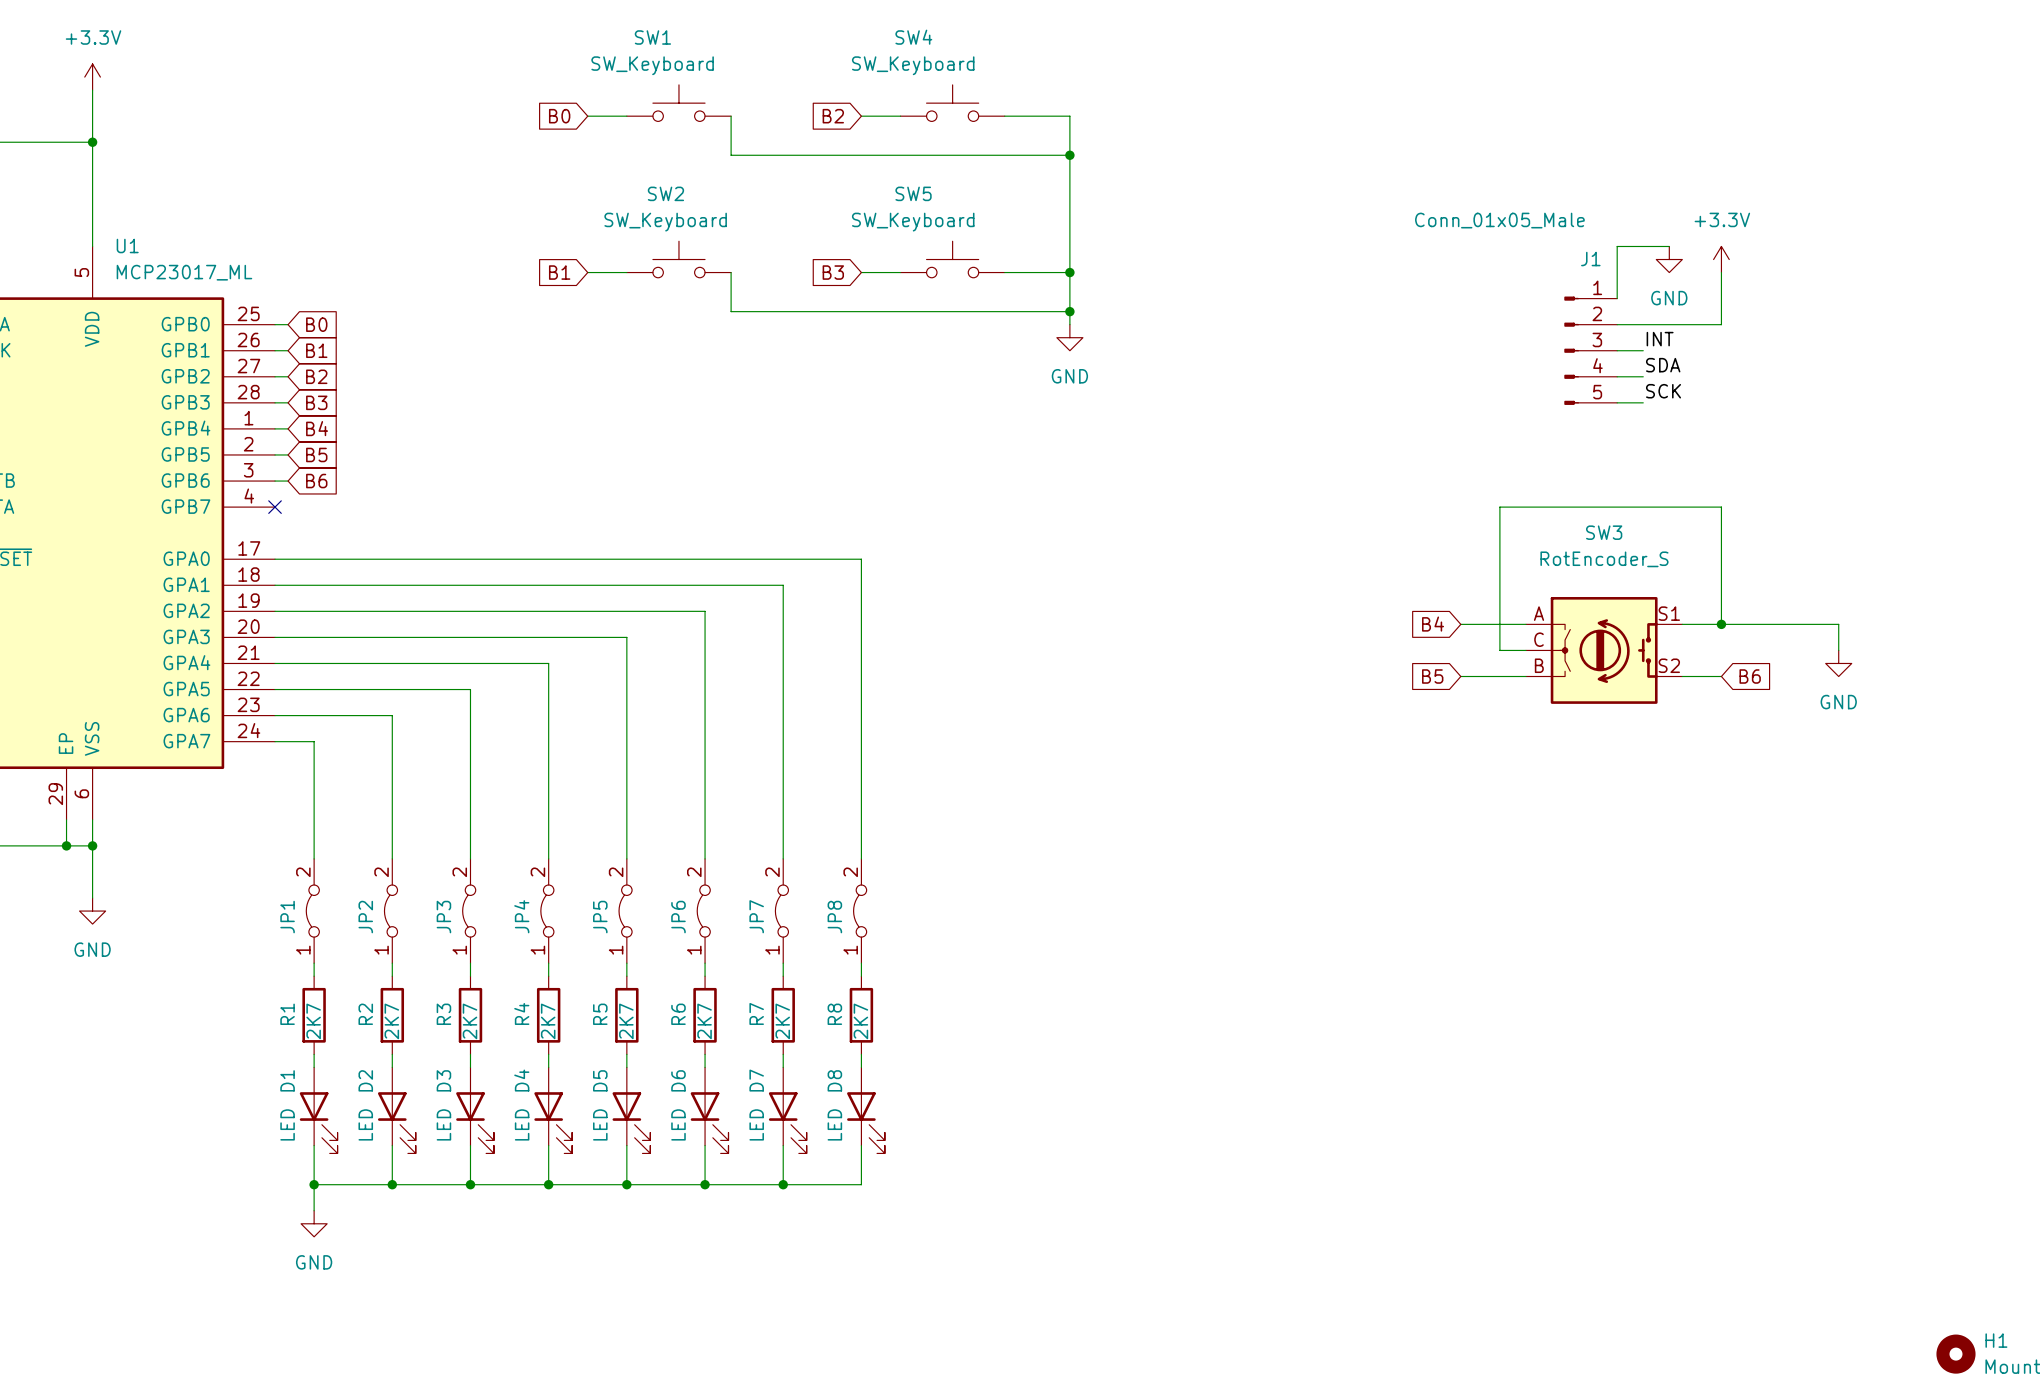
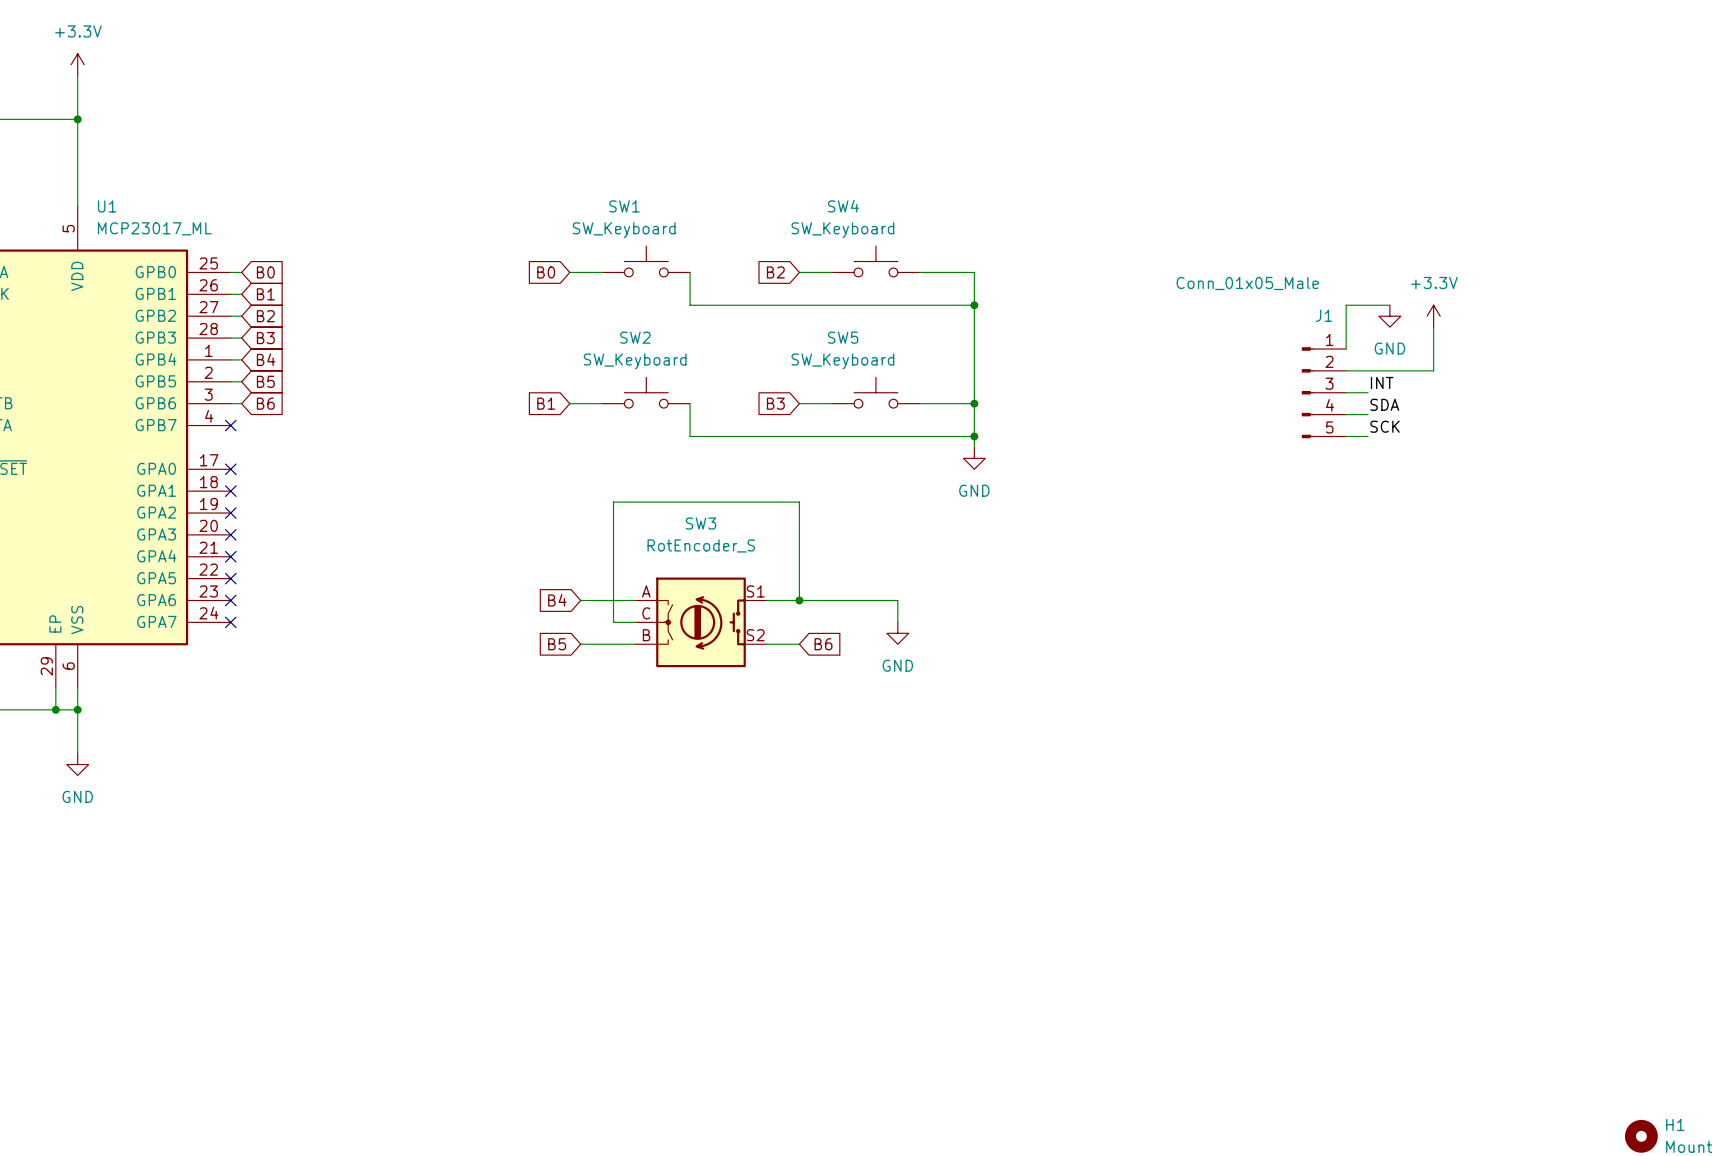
SW1 position: (678, 103) -> (646, 261)
SW4 position: (952, 103) -> (875, 261)
global label position: B0 (559, 116) -> B0 (546, 272)
wire: (587, 116) (626, 116) -> (569, 272) (602, 272)
wire: (731, 116) (731, 155) (1069, 155) -> (690, 272) (690, 305) (974, 305)
global label position: B2 (833, 116) -> B2 (775, 272)
wire: (861, 116) (900, 116) -> (799, 272) (832, 272)
wire: (1004, 116) (1069, 116) (1069, 324) -> (919, 272) (974, 272) (974, 447)
junction: (1069, 155) -> none
wire: (1669, 246) (1617, 246) (1617, 298) -> (1389, 305) (1346, 305) (1346, 348)
SW2 position: (678, 259) -> (646, 392)
SW5 position: (952, 259) -> (875, 392)
power symbol position: GND (1669, 259) -> GND (1389, 316)
power symbol position: +3.3V (1721, 259) -> +3.3V (1433, 316)
global label position: B1 (559, 272) -> B1 (546, 403)
wire: (587, 272) (626, 272) -> (569, 403) (602, 403)
wire: (731, 272) (731, 311) (1069, 311) -> (690, 403) (690, 436) (974, 436)
global label position: B3 (833, 272) -> B3 (775, 403)
wire: (861, 272) (900, 272) -> (799, 403) (832, 403)
wire: (1004, 272) (1069, 272) -> (919, 403) (974, 403)
junction: (1069, 272) -> none
wire: (1721, 272) (1721, 324) (1617, 324) -> (1433, 327) (1433, 370) (1346, 370)
junction: (1069, 311) -> none
power symbol: GND (1069, 337) -> none
label position: INT (1660, 339) -> INT (1382, 382)
J1 position: (1590, 350) -> (1323, 392)
wire: (1617, 350) (1643, 350) -> (1346, 392) (1368, 392)
junction: none -> (974, 305)
label position: SDA (1663, 365) -> SDA (1384, 404)
wire: (1617, 376) (1643, 376) -> (1346, 414) (1368, 414)
label position: SCK (1663, 391) -> SCK (1385, 426)
wire: (1617, 402) (1643, 402) -> (1346, 436) (1368, 436)
junction: none -> (974, 403)
junction: none -> (974, 436)
power symbol: none -> GND (974, 458)
wire: (275, 559) (861, 559) (861, 858) -> none
no-connect mark: none -> (230, 469)
wire: (275, 585) (783, 585) (783, 858) -> none
no-connect mark: none -> (230, 491)
wire: (275, 611) (705, 611) (705, 858) -> none
no-connect mark: none -> (230, 513)
global label: B4 (1433, 624) -> none
wire: (1460, 624) (1525, 624) -> none
wire: (1682, 624) (1838, 624) (1838, 650) -> none
wire: (1721, 624) (1721, 507) (1499, 507) (1499, 650) (1525, 650) -> none
junction: (1721, 624) -> none
wire: (275, 637) (626, 637) (626, 858) -> none
no-connect mark: none -> (230, 534)
SW3 position: (1604, 650) -> (700, 622)
wire: (275, 663) (548, 663) (548, 858) -> none
no-connect mark: none -> (230, 556)
power symbol: GND (1838, 663) -> none
global label: B5 (1432, 676) -> none
wire: (1460, 676) (1525, 676) -> none
wire: (1682, 676) (1721, 676) -> none
global label: B6 (1750, 676) -> none
wire: (275, 689) (470, 689) (470, 858) -> none
no-connect mark: none -> (230, 578)
wire: (275, 715) (392, 715) (392, 858) -> none
no-connect mark: none -> (230, 600)
global label: none -> B4 (557, 600)
wire: none -> (580, 600) (635, 600)
wire: none -> (766, 600) (897, 600) (897, 622)
wire: none -> (799, 600) (799, 502) (613, 502) (613, 622) (635, 622)
junction: none -> (799, 600)
wire: (275, 741) (314, 741) (314, 858) -> none
no-connect mark: none -> (230, 622)
power symbol: none -> GND (897, 633)
global label: none -> B5 (557, 644)
wire: none -> (580, 644) (635, 644)
wire: none -> (766, 644) (799, 644)
global label: none -> B6 (823, 644)
JP1: (312, 911) -> none
JP2: (390, 911) -> none
JP3: (469, 911) -> none
JP4: (547, 911) -> none
JP5: (625, 911) -> none
JP6: (703, 911) -> none
JP7: (781, 911) -> none
JP8: (860, 911) -> none
wire: (314, 963) (314, 976) -> none
wire: (392, 963) (392, 976) -> none
wire: (470, 963) (470, 976) -> none
wire: (548, 963) (548, 976) -> none
wire: (626, 963) (626, 976) -> none
wire: (705, 963) (705, 976) -> none
wire: (783, 963) (783, 976) -> none
wire: (861, 963) (861, 976) -> none
R1: 2K7 (314, 1015) -> none
R2: 2K7 (392, 1015) -> none
R3: 2K7 (470, 1015) -> none
R4: 2K7 (548, 1015) -> none
R5: 2K7 (626, 1015) -> none
R6: 2K7 (705, 1015) -> none
R7: 2K7 (783, 1015) -> none
R8: 2K7 (861, 1015) -> none
wire: (314, 1054) (314, 1067) -> none
wire: (392, 1054) (392, 1067) -> none
wire: (470, 1054) (470, 1067) -> none
wire: (548, 1054) (548, 1067) -> none
wire: (626, 1054) (626, 1067) -> none
wire: (705, 1054) (705, 1067) -> none
wire: (783, 1054) (783, 1067) -> none
wire: (861, 1054) (861, 1067) -> none
D1: LED (318, 1110) -> none
D2: LED (396, 1110) -> none
D3: LED (475, 1110) -> none
D4: LED (553, 1110) -> none
D5: LED (631, 1110) -> none
D6: LED (709, 1110) -> none
D7: LED (787, 1110) -> none
D8: LED (865, 1110) -> none
wire: (314, 1145) (314, 1210) -> none
wire: (392, 1145) (392, 1184) -> none
wire: (470, 1145) (470, 1184) -> none
wire: (548, 1145) (548, 1184) -> none
wire: (626, 1145) (626, 1184) -> none
wire: (705, 1145) (705, 1184) -> none
wire: (783, 1145) (783, 1184) -> none
wire: (861, 1145) (861, 1184) (314, 1184) -> none
junction: (314, 1184) -> none
junction: (392, 1184) -> none
junction: (470, 1184) -> none
junction: (548, 1184) -> none
junction: (626, 1184) -> none
junction: (705, 1184) -> none
junction: (783, 1184) -> none
power symbol: GND (314, 1223) -> none

